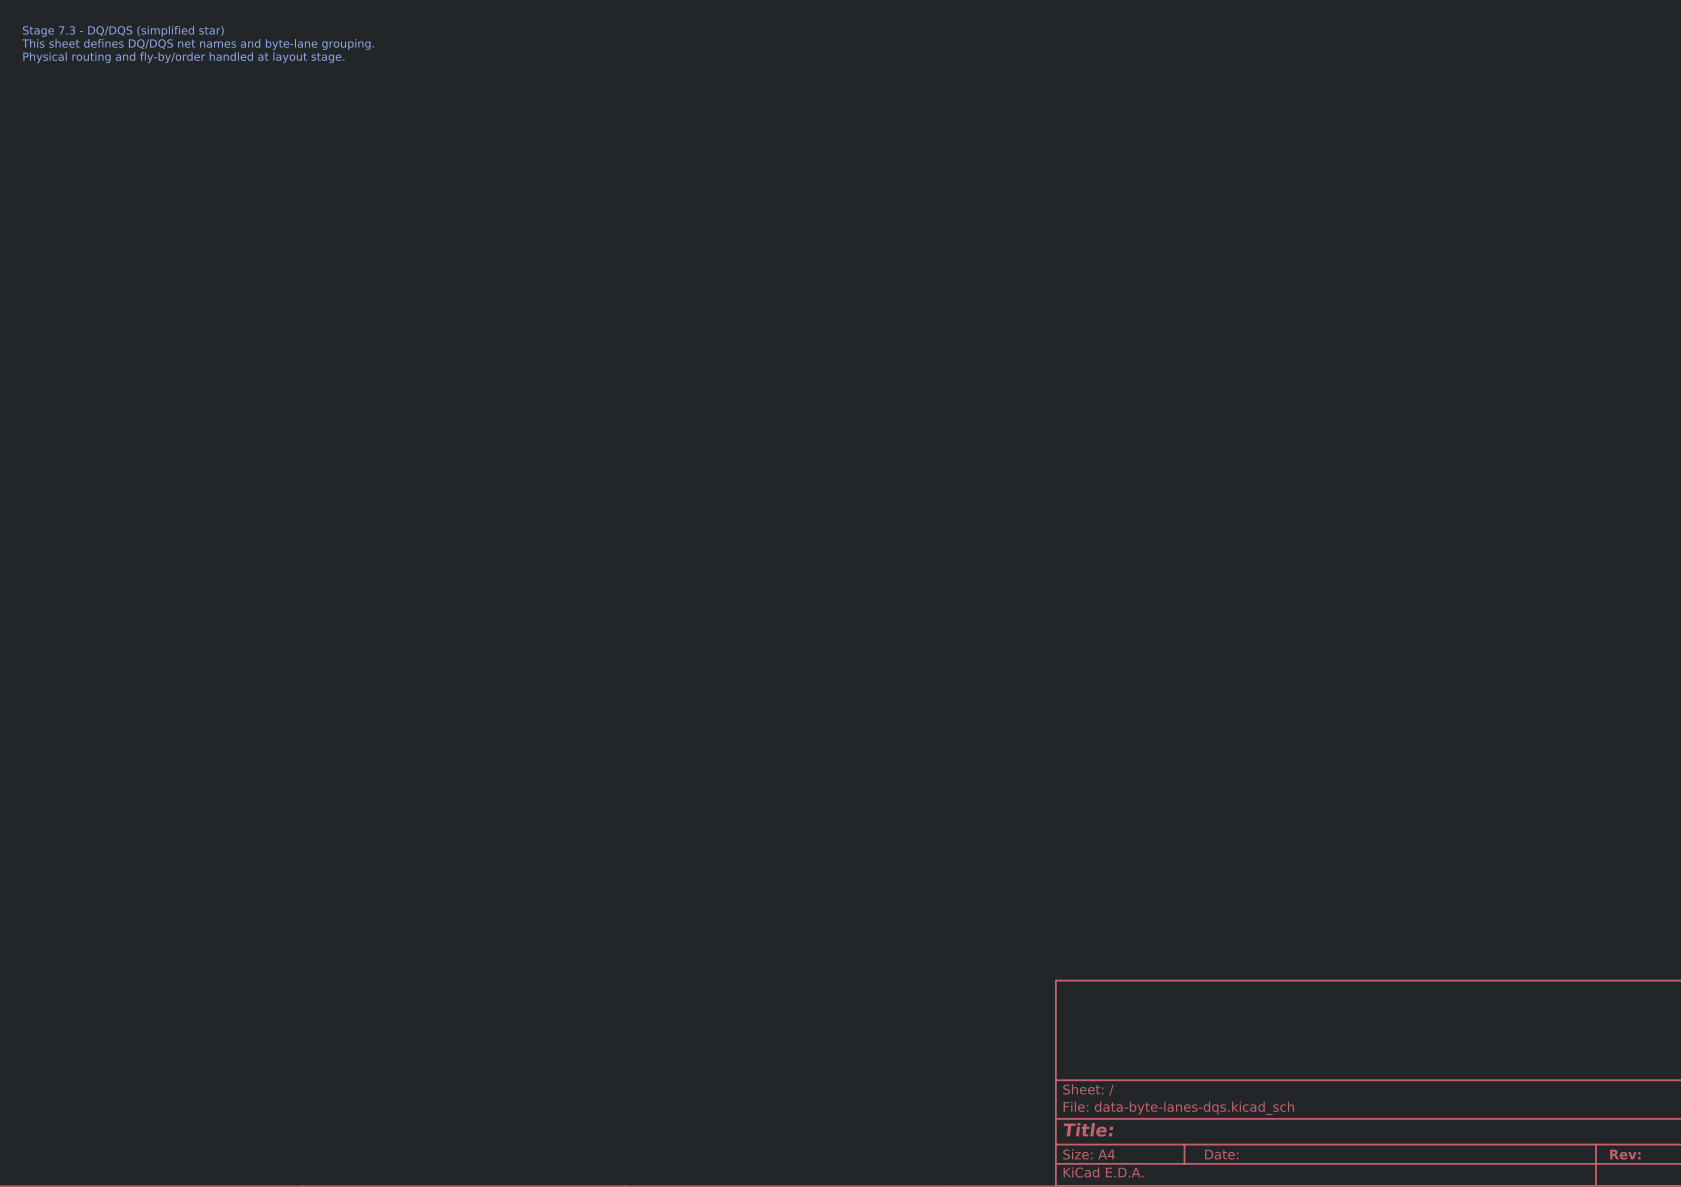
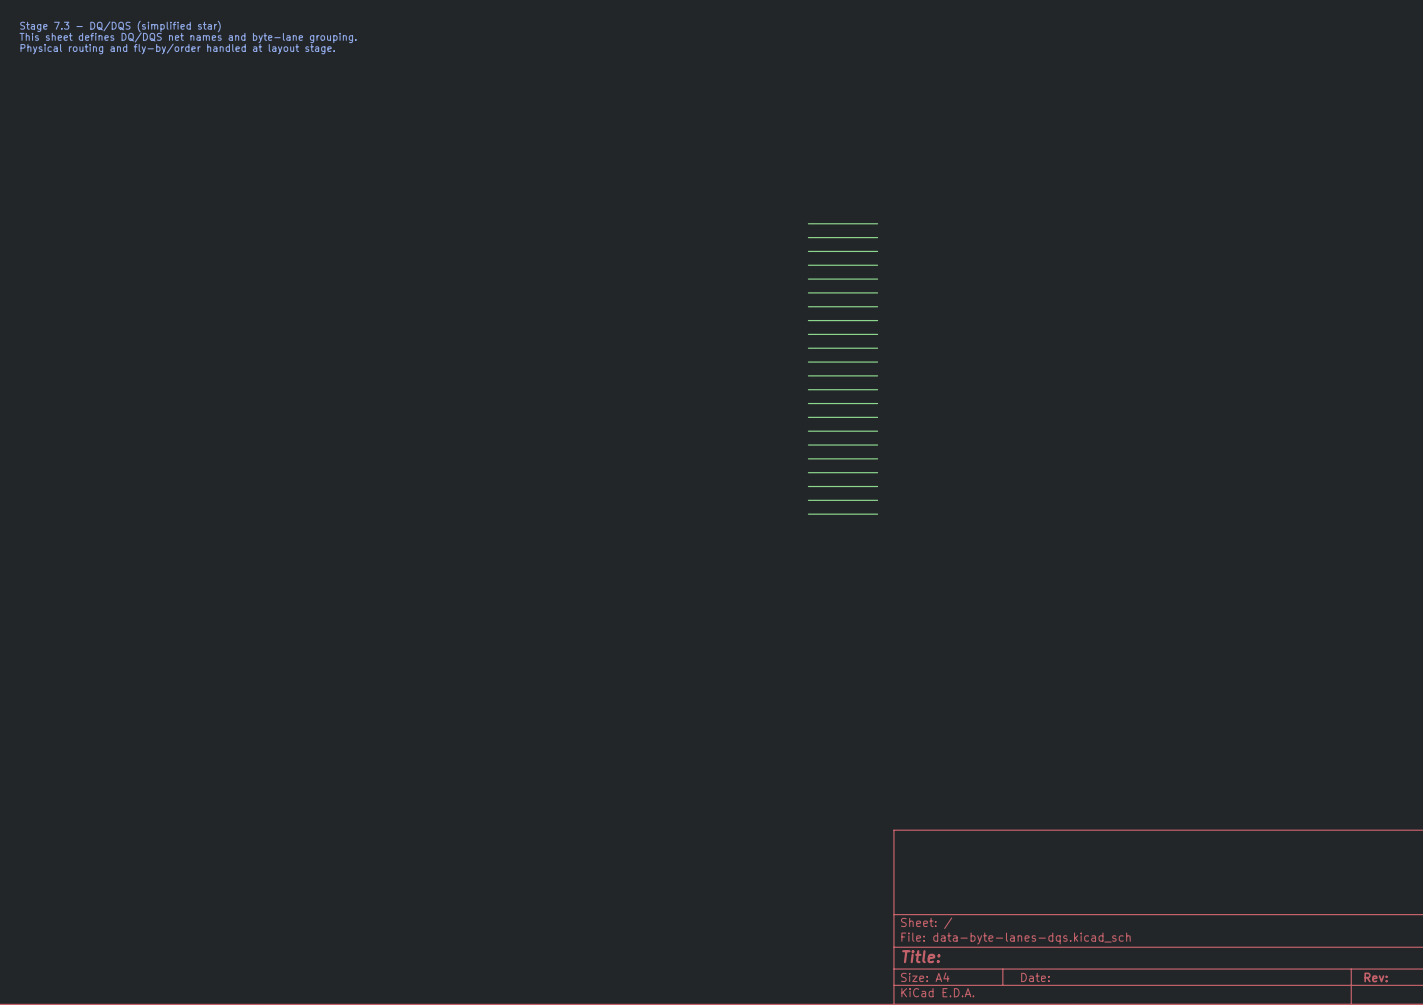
wire: none -> (808, 223) (877, 223)
wire: none -> (808, 237) (877, 237)
wire: none -> (808, 251) (877, 251)
wire: none -> (808, 265) (877, 265)
wire: none -> (808, 279) (877, 279)
wire: none -> (808, 292) (877, 292)
wire: none -> (808, 306) (877, 306)
wire: none -> (808, 320) (877, 320)
wire: none -> (808, 334) (877, 334)
wire: none -> (808, 348) (877, 348)
wire: none -> (808, 362) (877, 362)
wire: none -> (808, 375) (877, 375)
wire: none -> (808, 389) (877, 389)
wire: none -> (808, 403) (877, 403)
wire: none -> (808, 417) (877, 417)
wire: none -> (808, 431) (877, 431)
wire: none -> (808, 445) (877, 445)
wire: none -> (808, 458) (877, 458)
wire: none -> (808, 472) (877, 472)
wire: none -> (808, 486) (877, 486)
wire: none -> (808, 500) (877, 500)
wire: none -> (808, 514) (877, 514)

